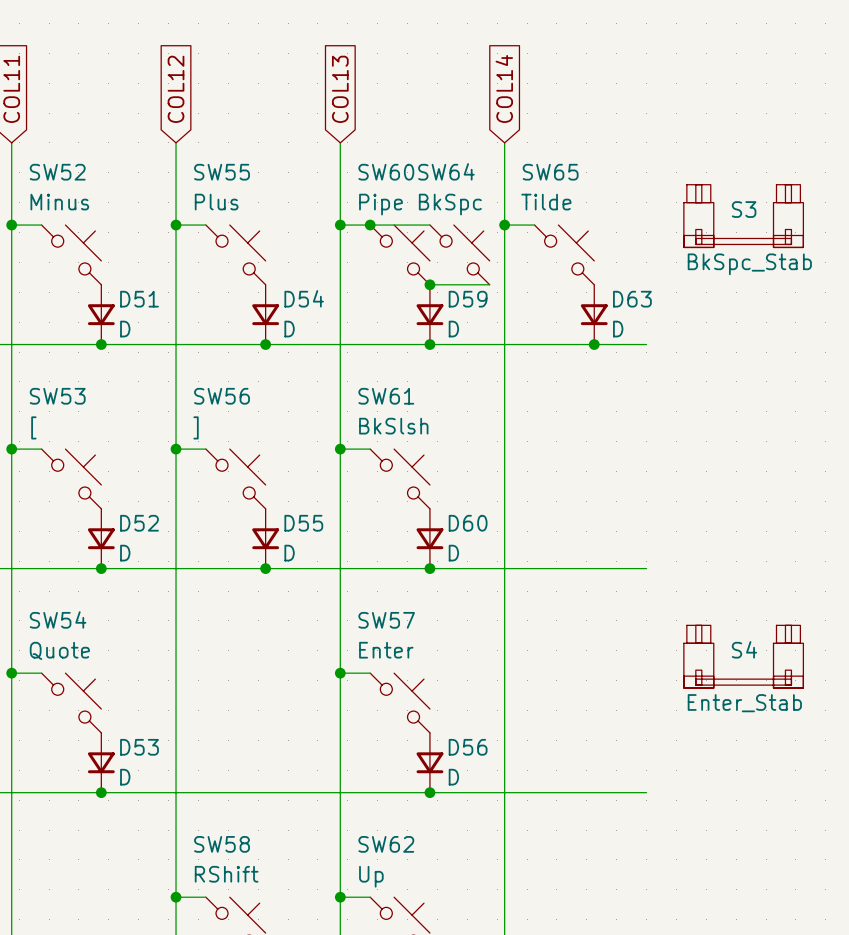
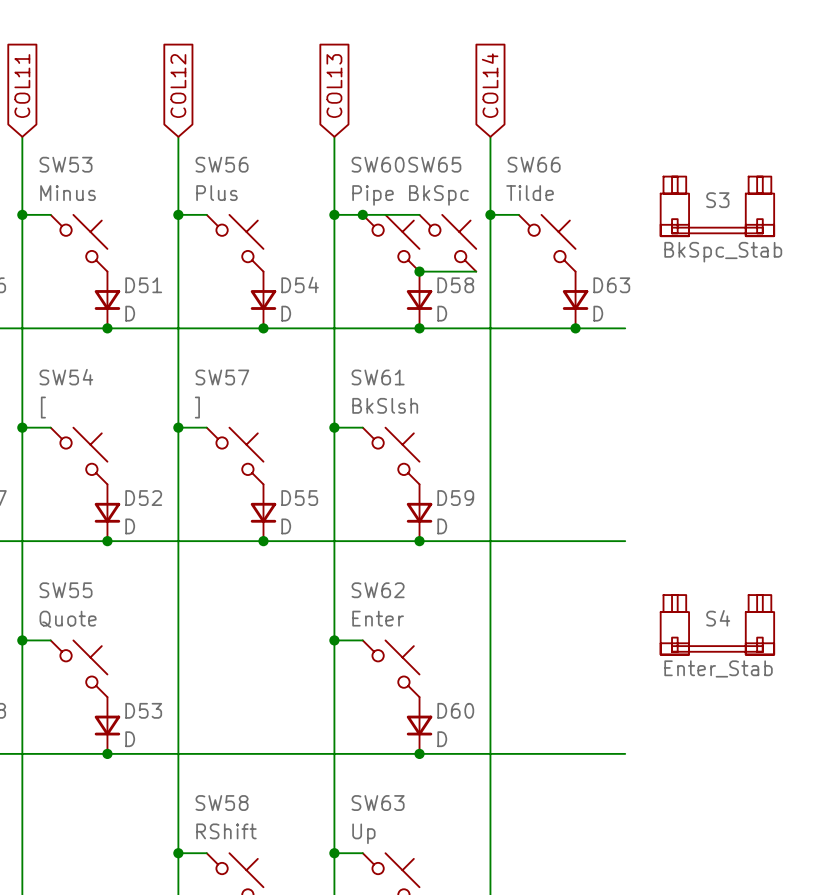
SW64 name: SW64 (446, 171) -> SW65 (434, 164)
SW52 name: SW52 (57, 172) -> SW53 (66, 164)
SW55 name: SW55 (222, 172) -> SW56 (222, 164)
SW65 name: SW65 (550, 172) -> SW66 (534, 164)
D59 name: D59 (468, 299) -> D58 (455, 285)
SW53 name: SW53 (57, 396) -> SW54 (66, 377)
SW56 name: SW56 (222, 396) -> SW57 (222, 377)
D60 name: D60 (468, 523) -> D59 (455, 498)
SW54 name: SW54 (58, 619) -> SW55 (66, 590)
SW57 name: SW57 (386, 620) -> SW62 (378, 590)
D56 name: D56 (468, 747) -> D60 (455, 710)
SW62 name: SW62 (386, 844) -> SW63 (378, 803)

